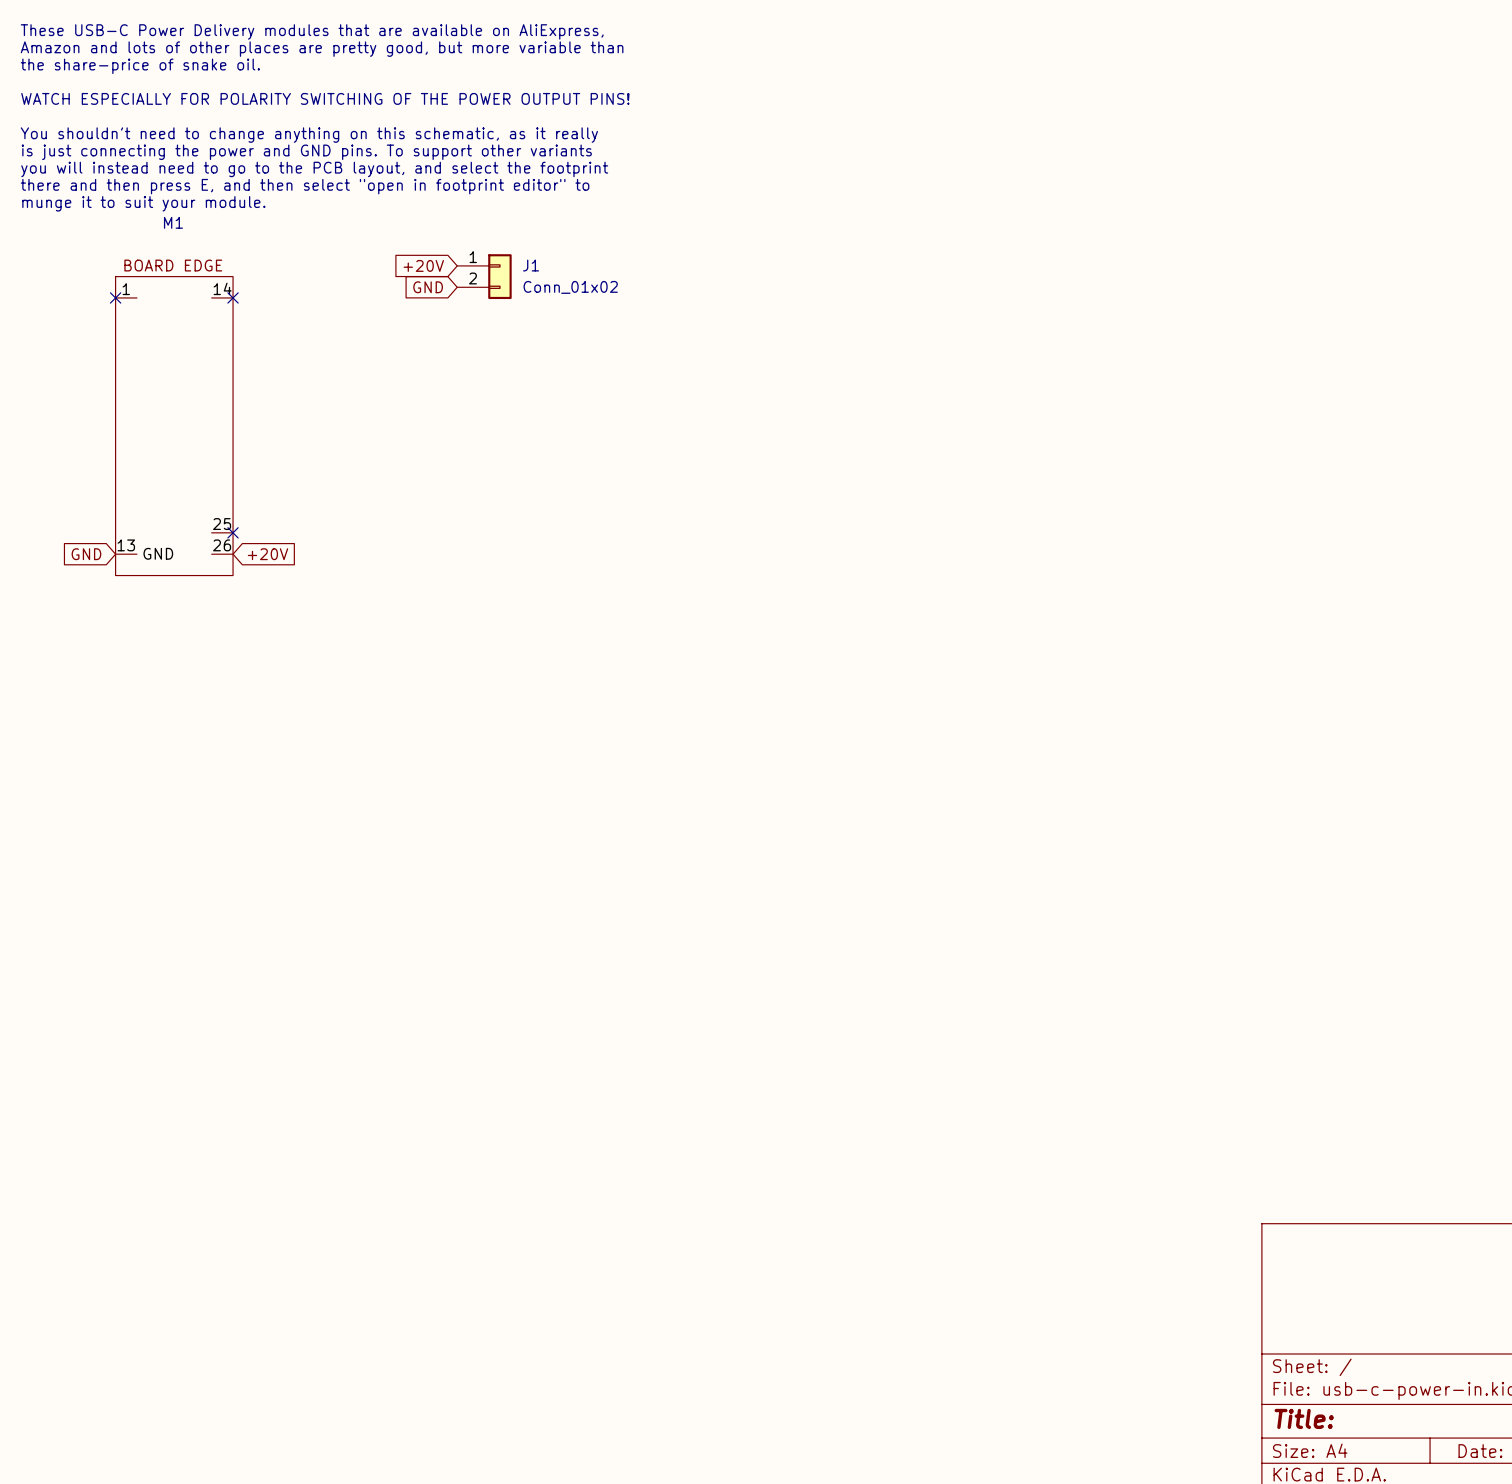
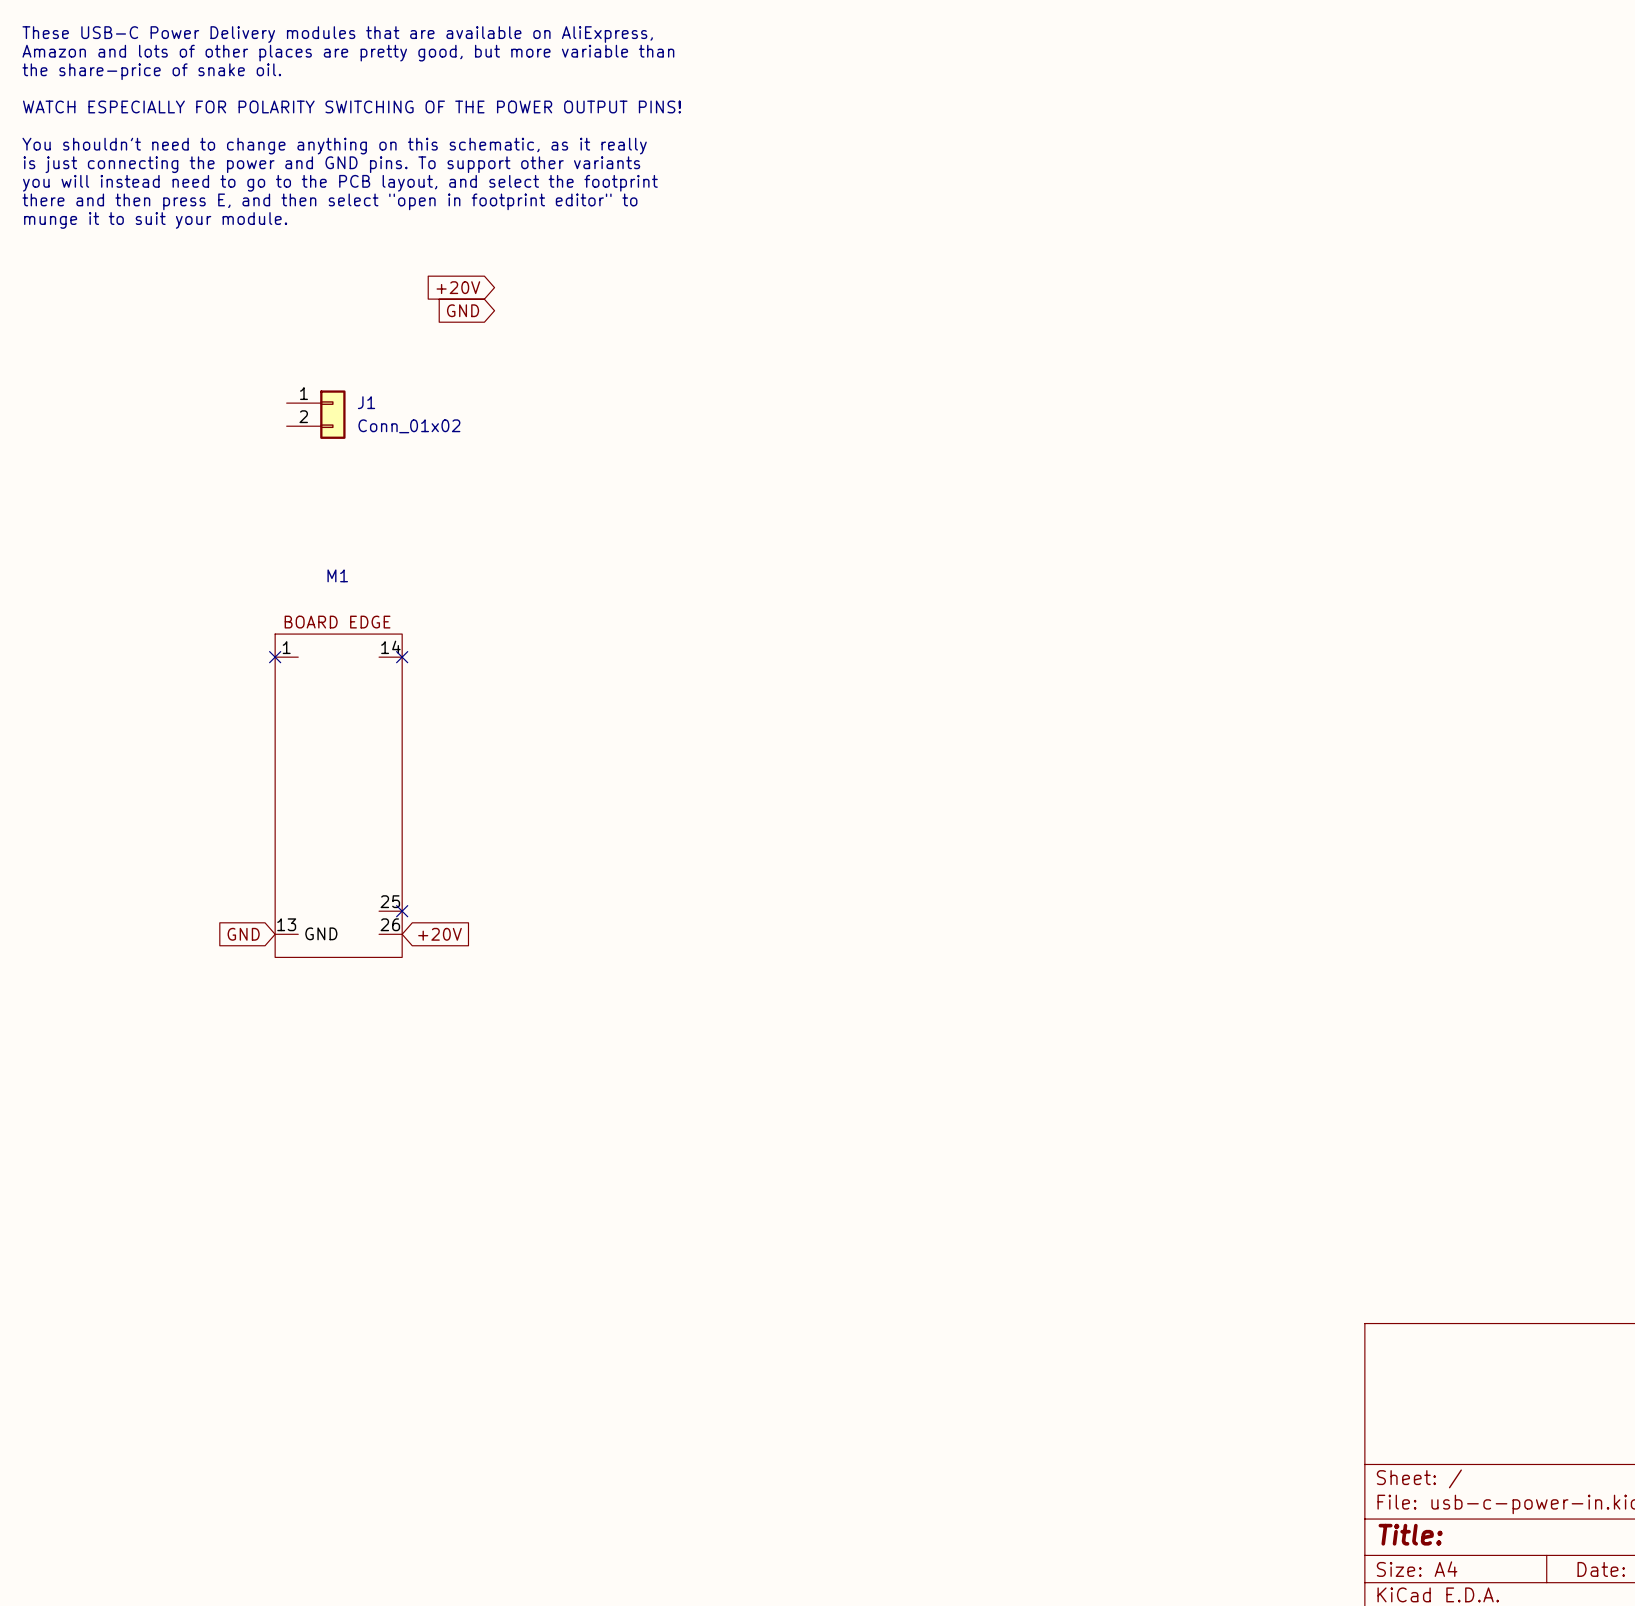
J1 position: (484, 276) -> (316, 414)
no-connect mark: (115, 297) -> none
no-connect mark: (233, 297) -> none
M1 position: (174, 426) -> (338, 795)
no-connect mark: (233, 532) -> none
global label: GND (86, 554) -> none
global label: +20V (268, 554) -> none
no-connect mark: none -> (275, 657)
no-connect mark: none -> (402, 657)
no-connect mark: none -> (402, 911)
global label: none -> GND (243, 934)
global label: none -> +20V (439, 934)

